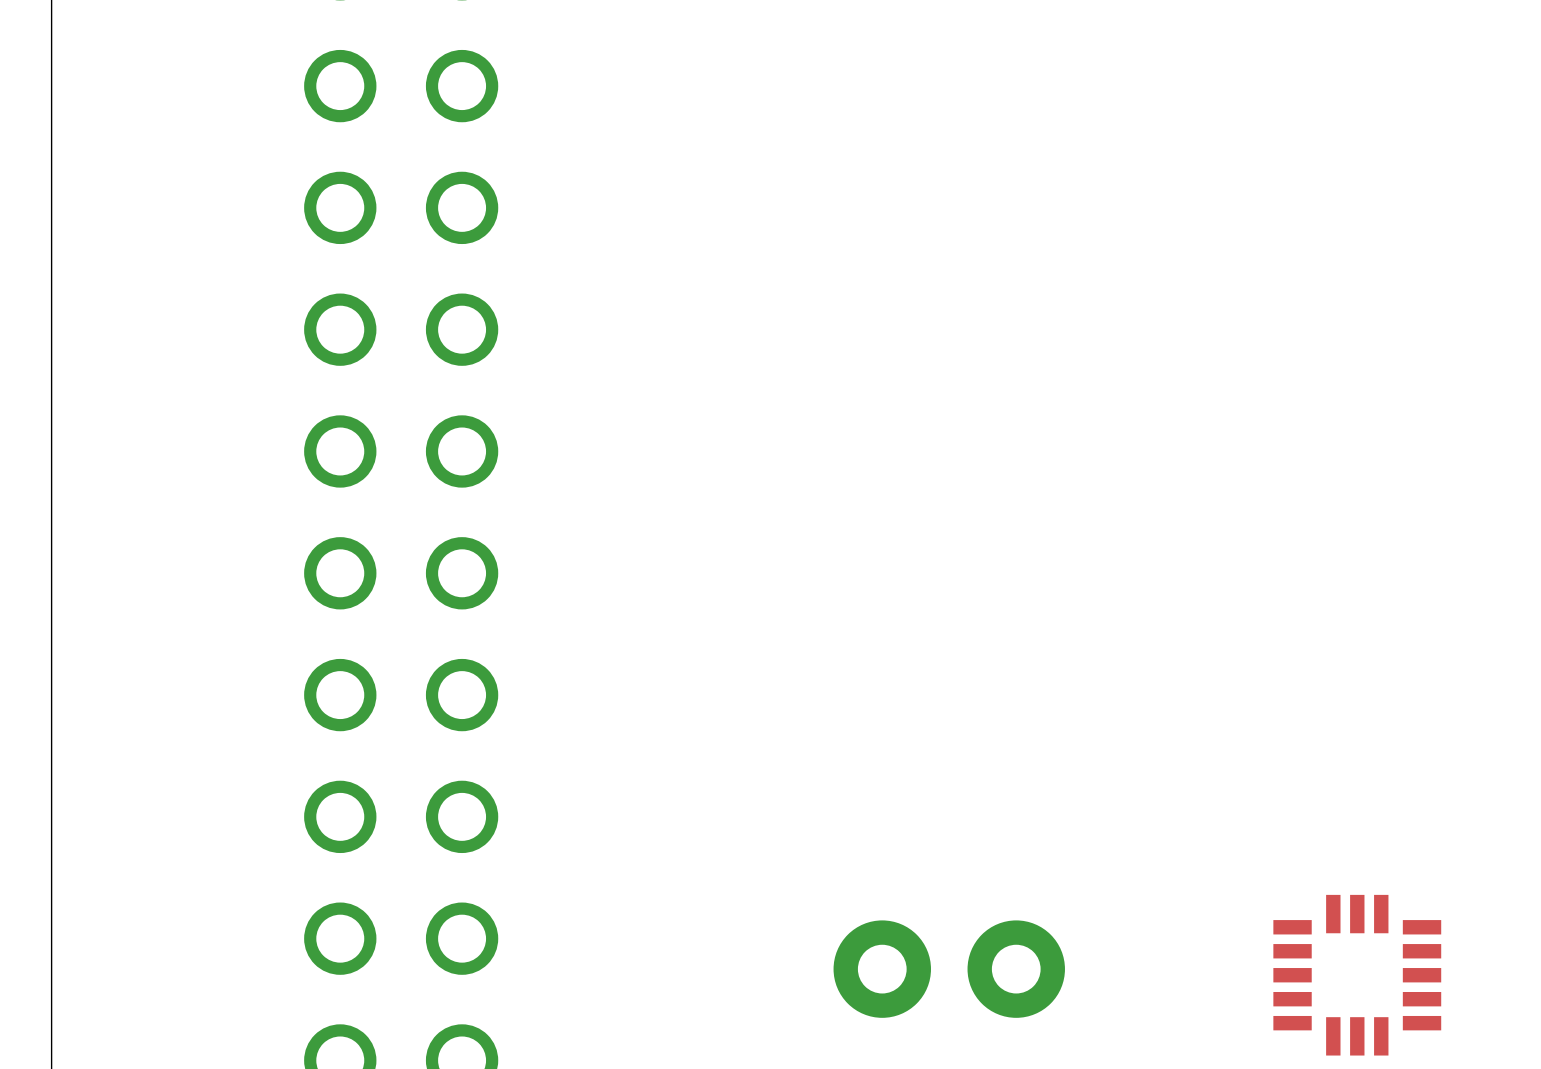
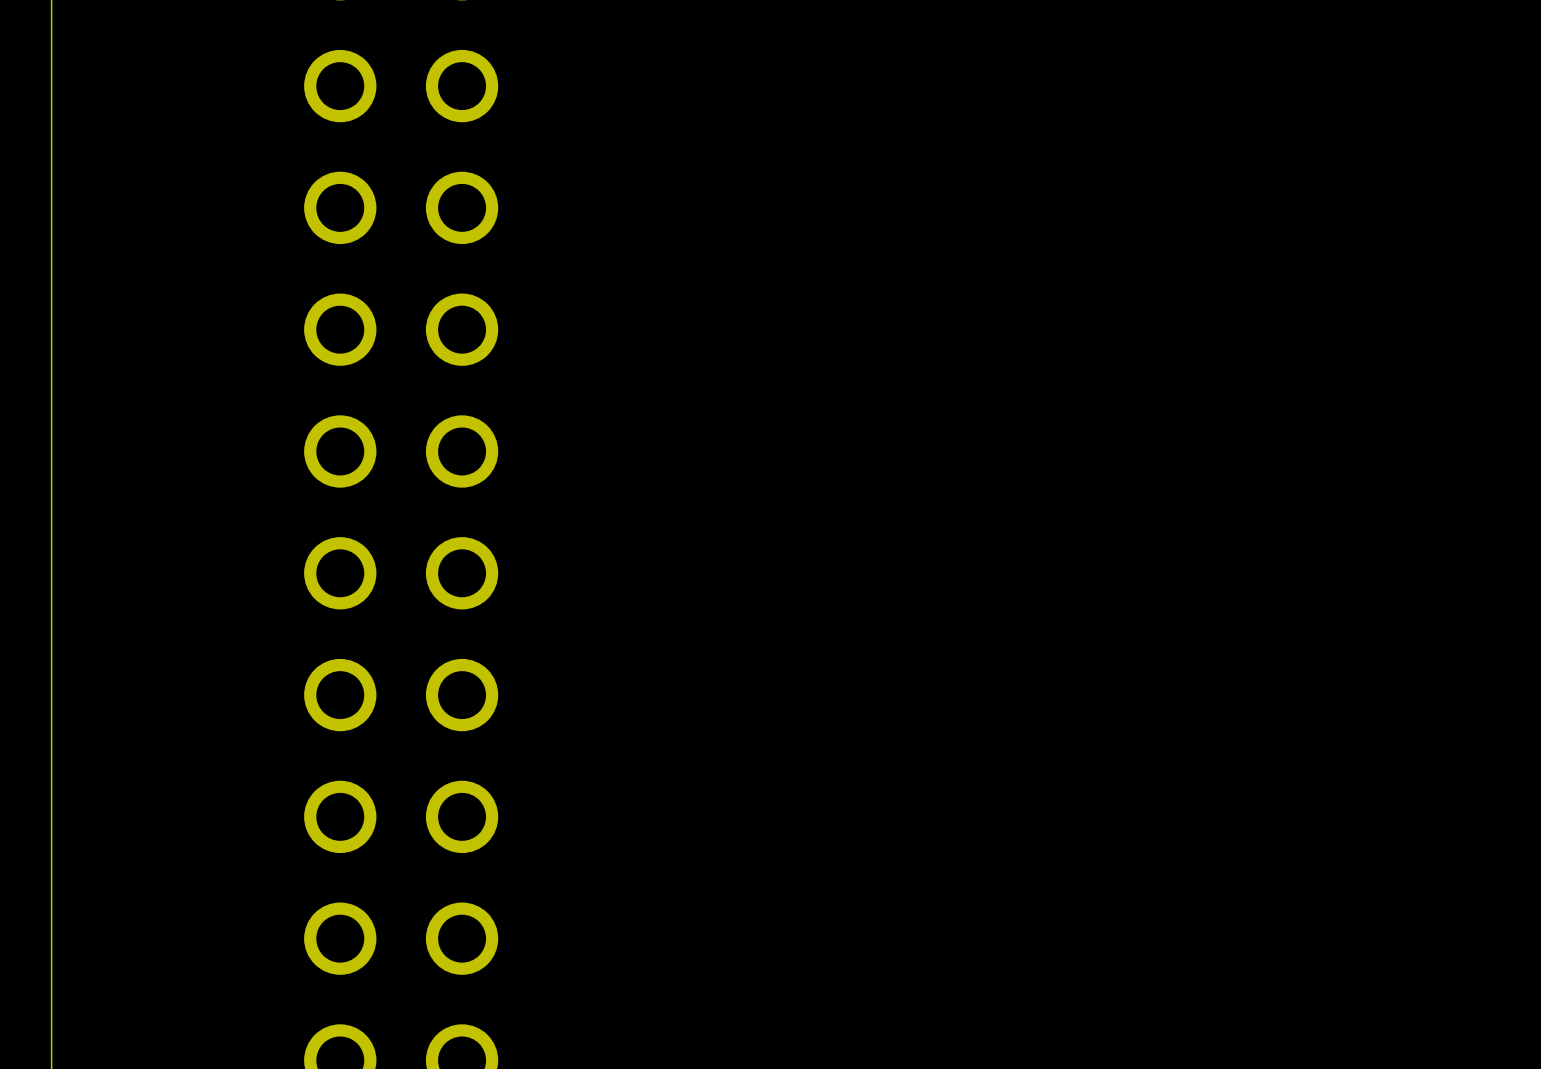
part: (949, 969) -> none
part: (1357, 975) -> none

